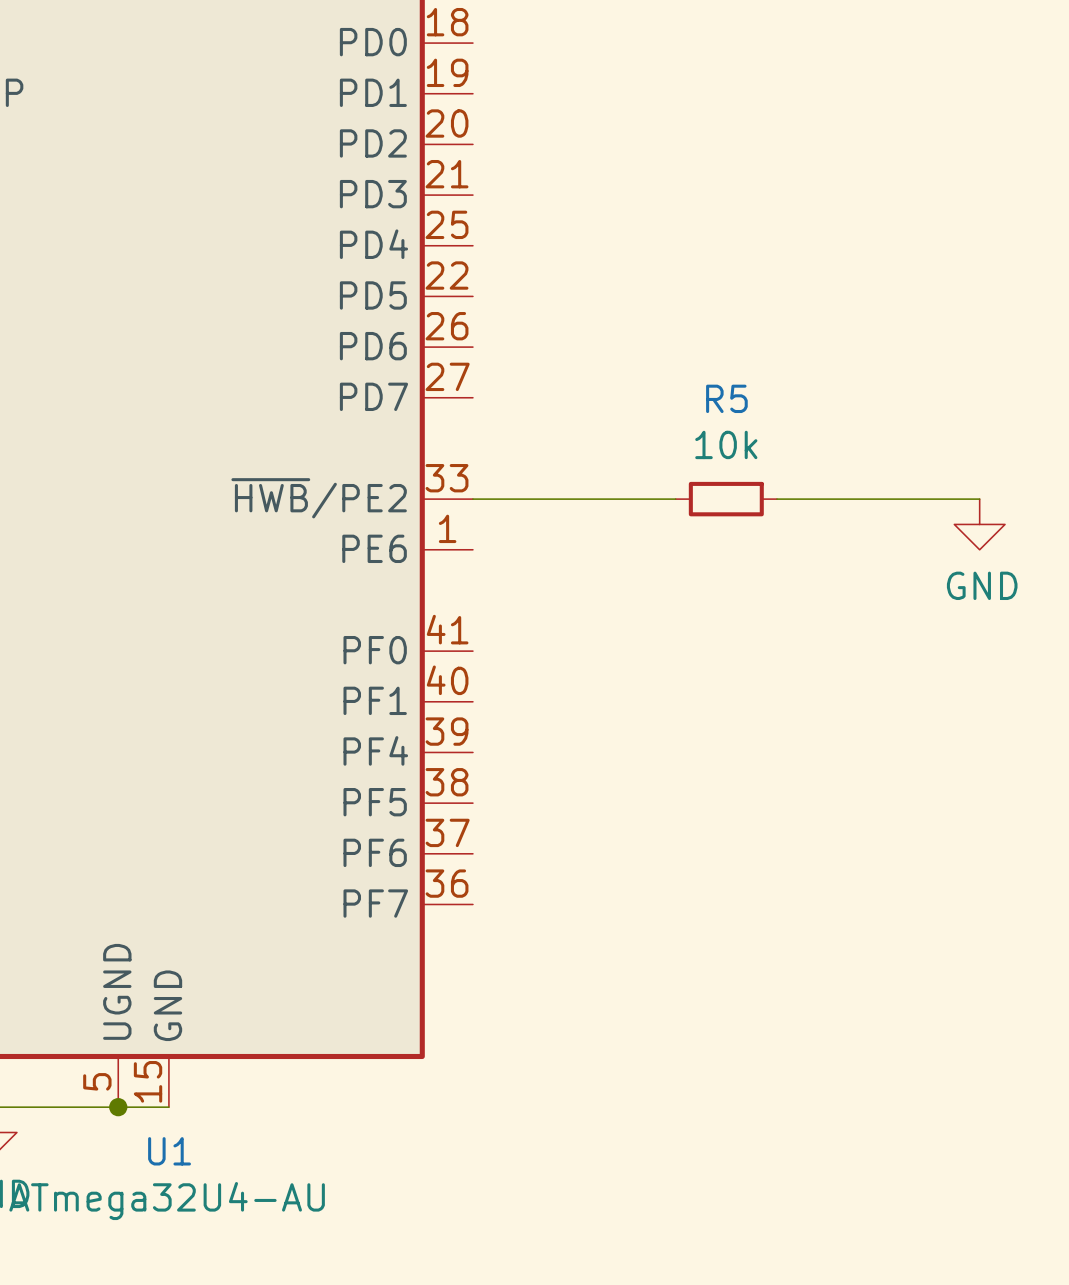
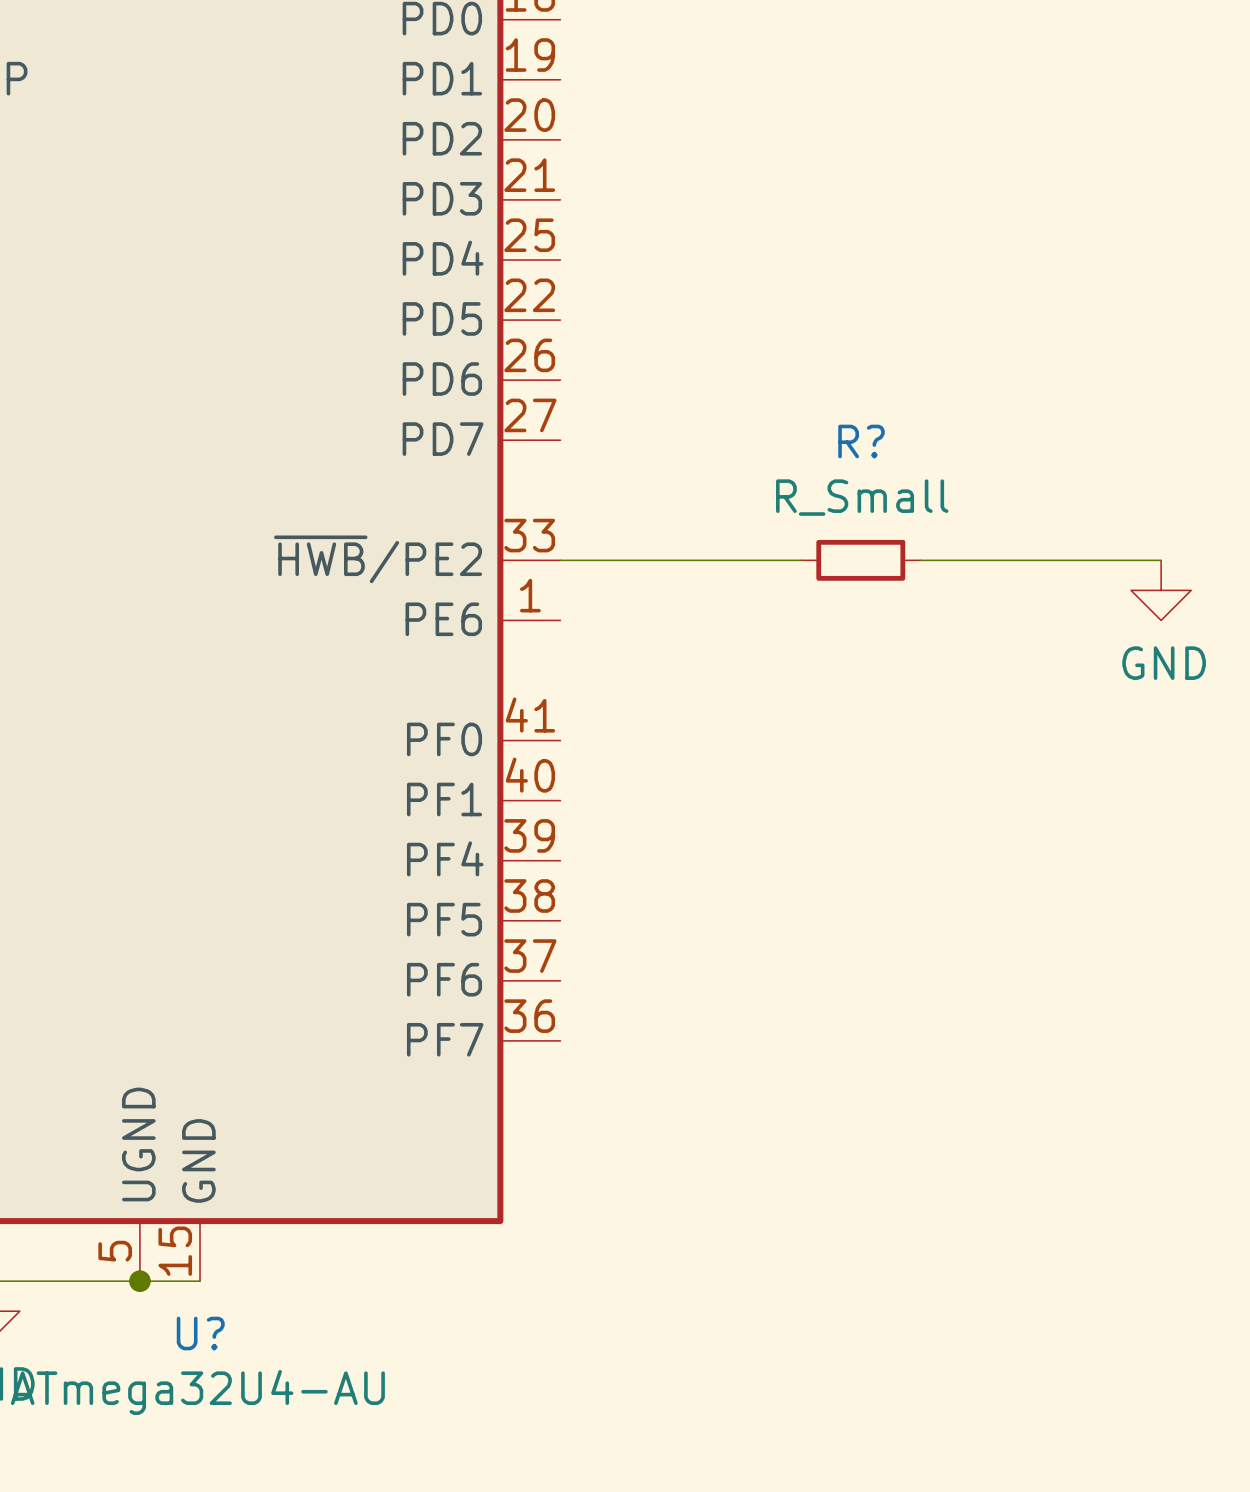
R5 name: R5 (726, 398) -> R? (861, 441)
R5 value: 10k (726, 444) -> R_Small (862, 497)
U1 name: U1 (169, 1151) -> U? (200, 1333)

